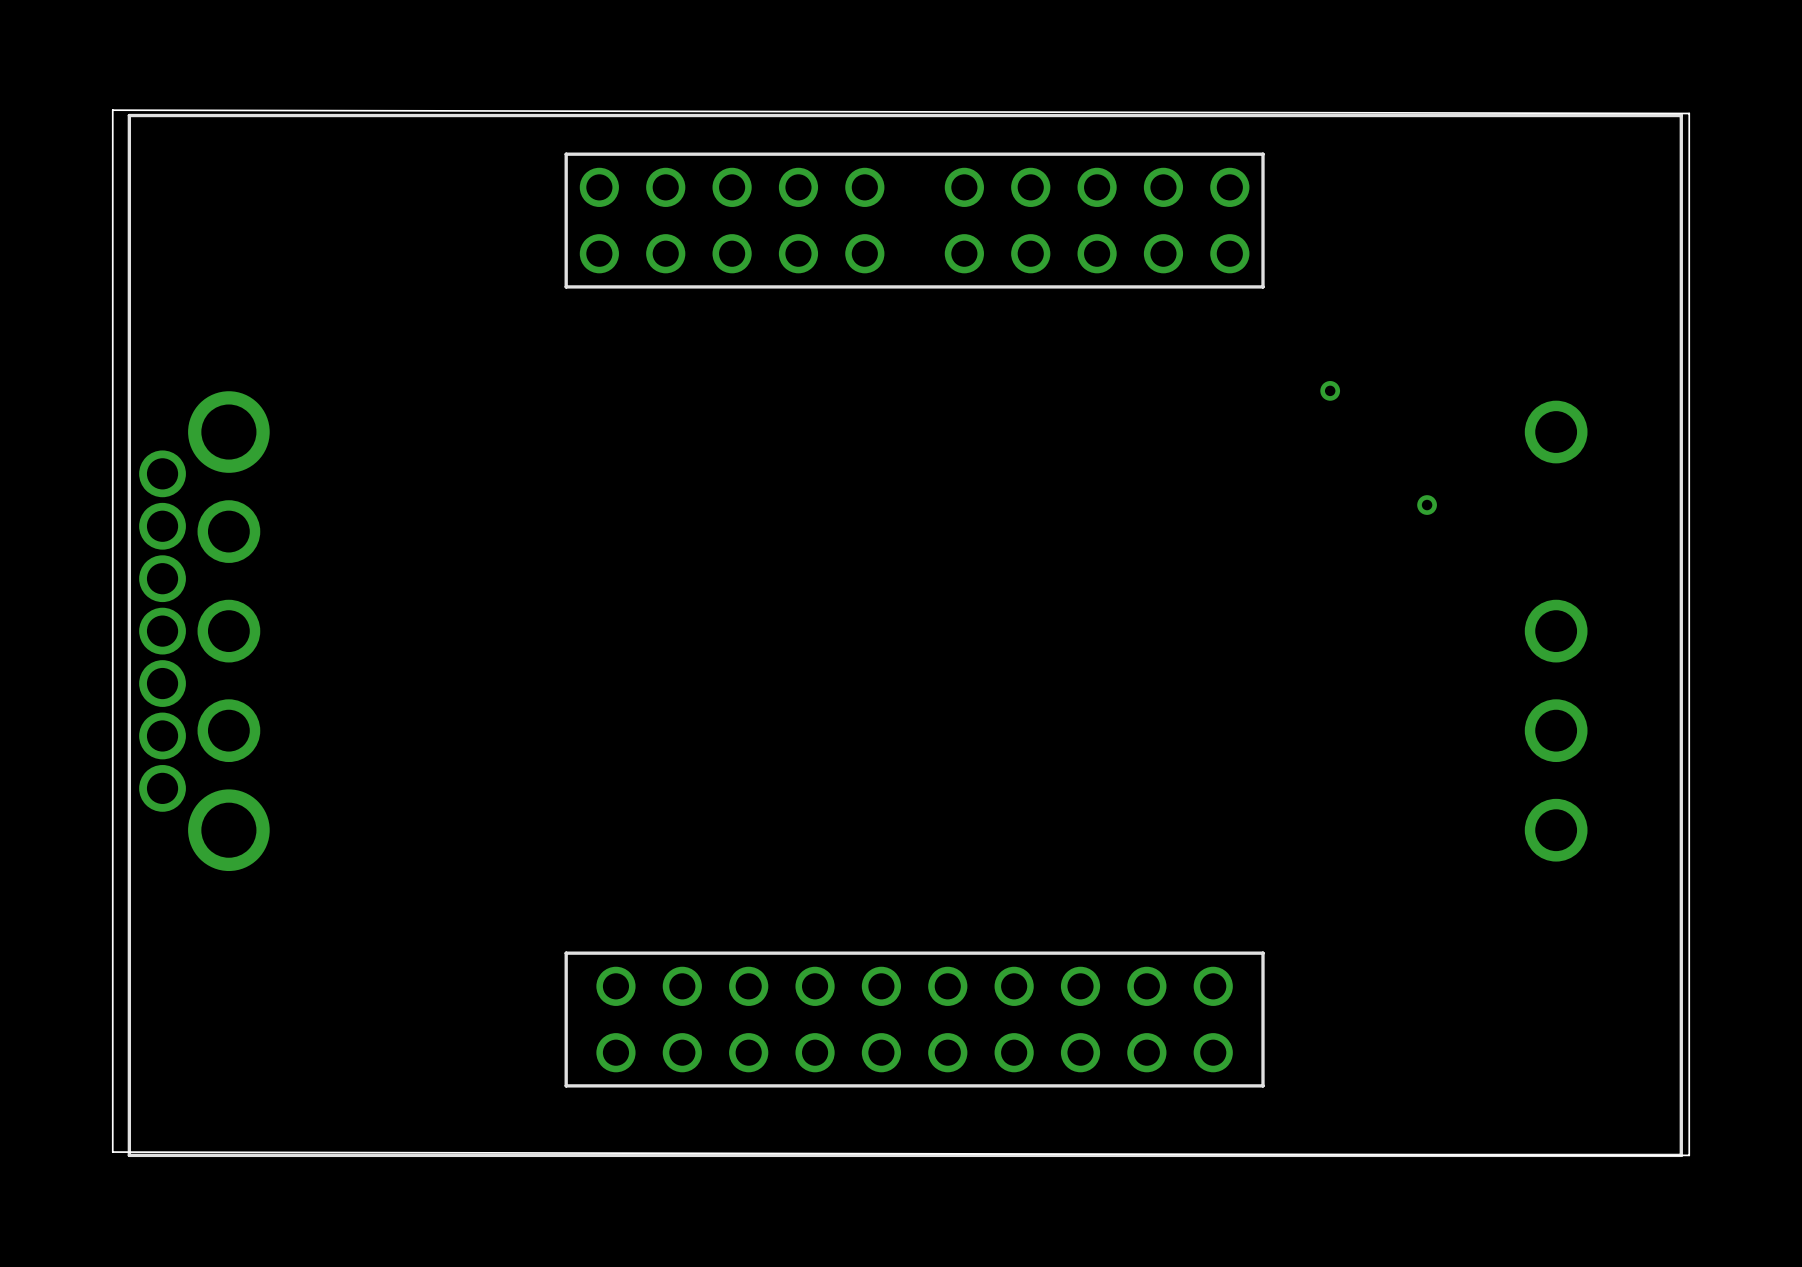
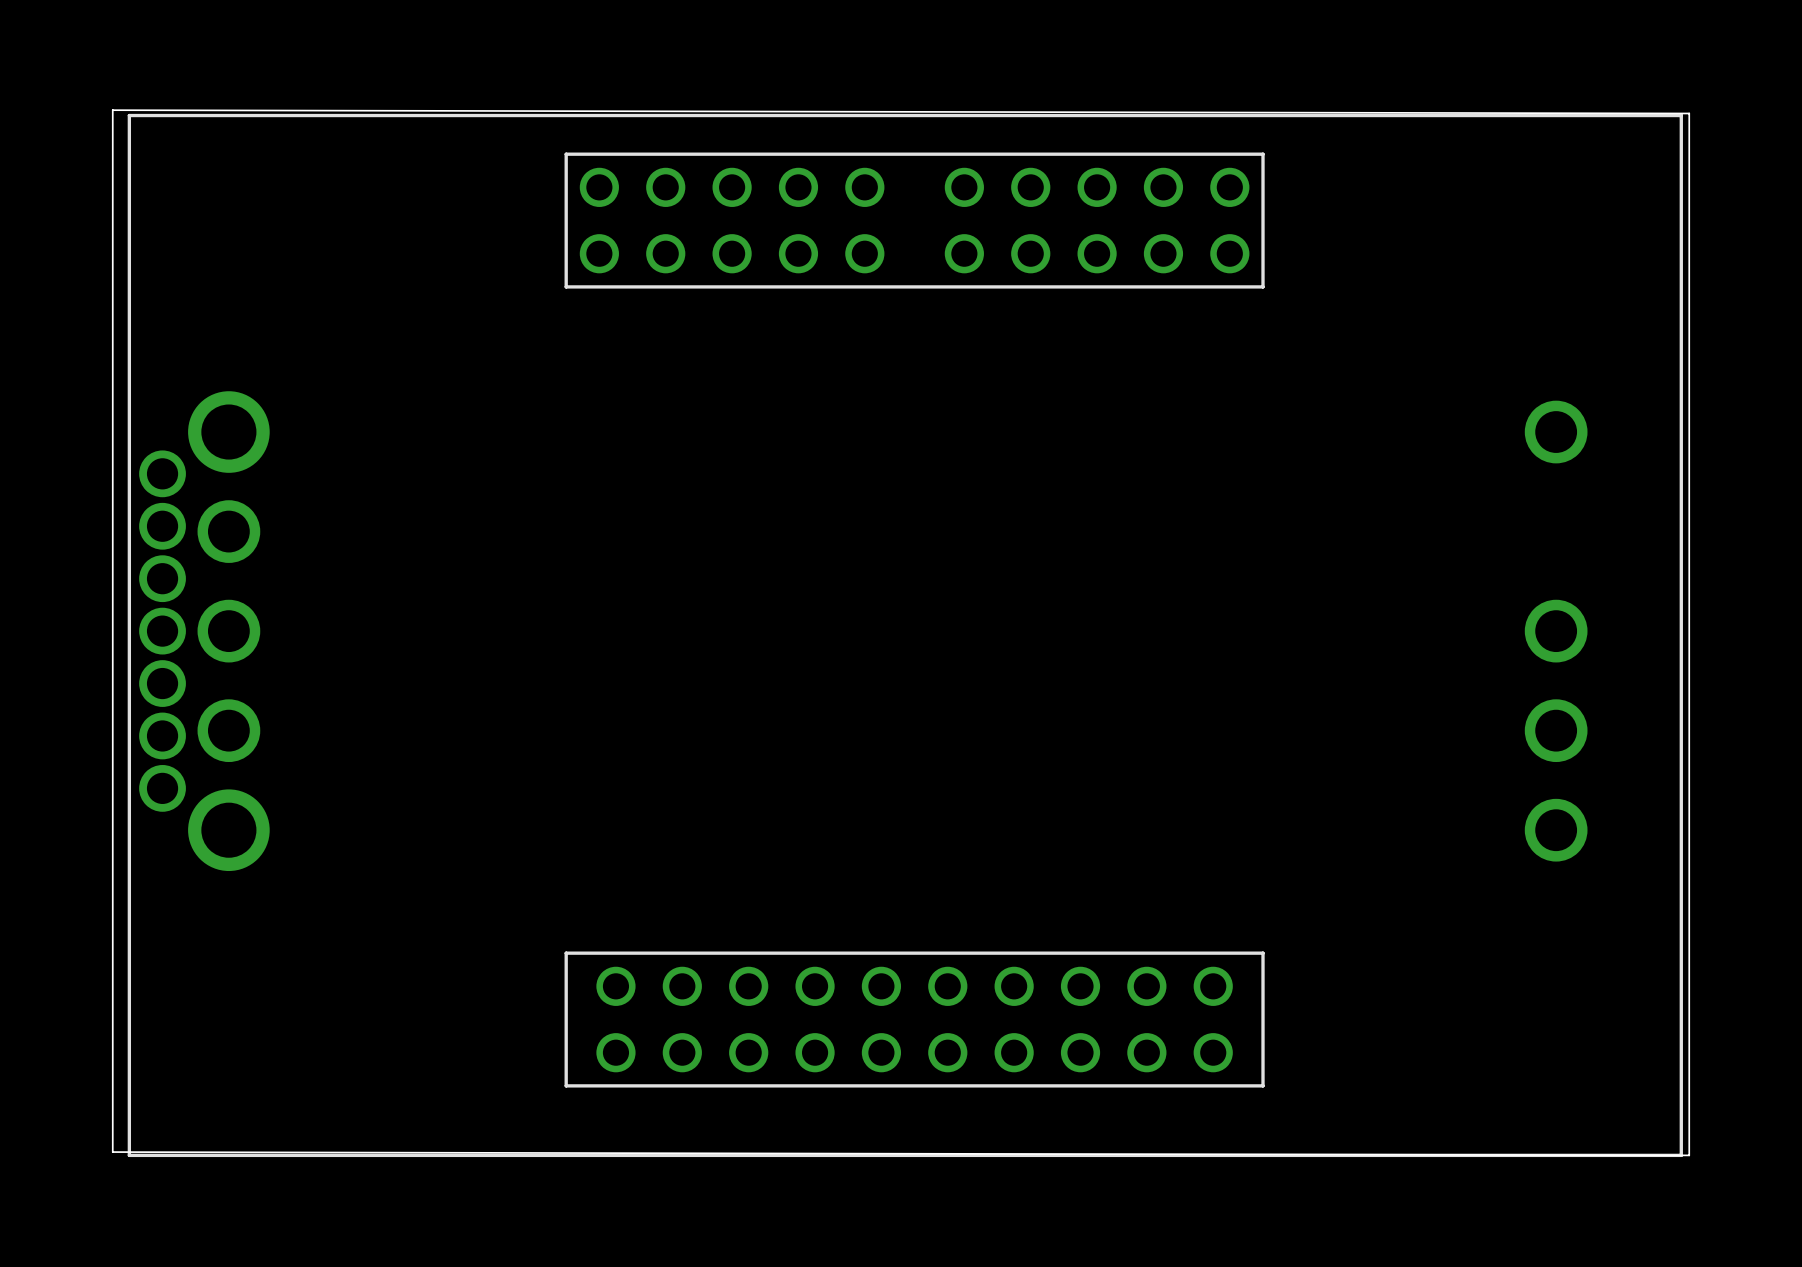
via: (1330, 390) -> none
via: (1427, 505) -> none

